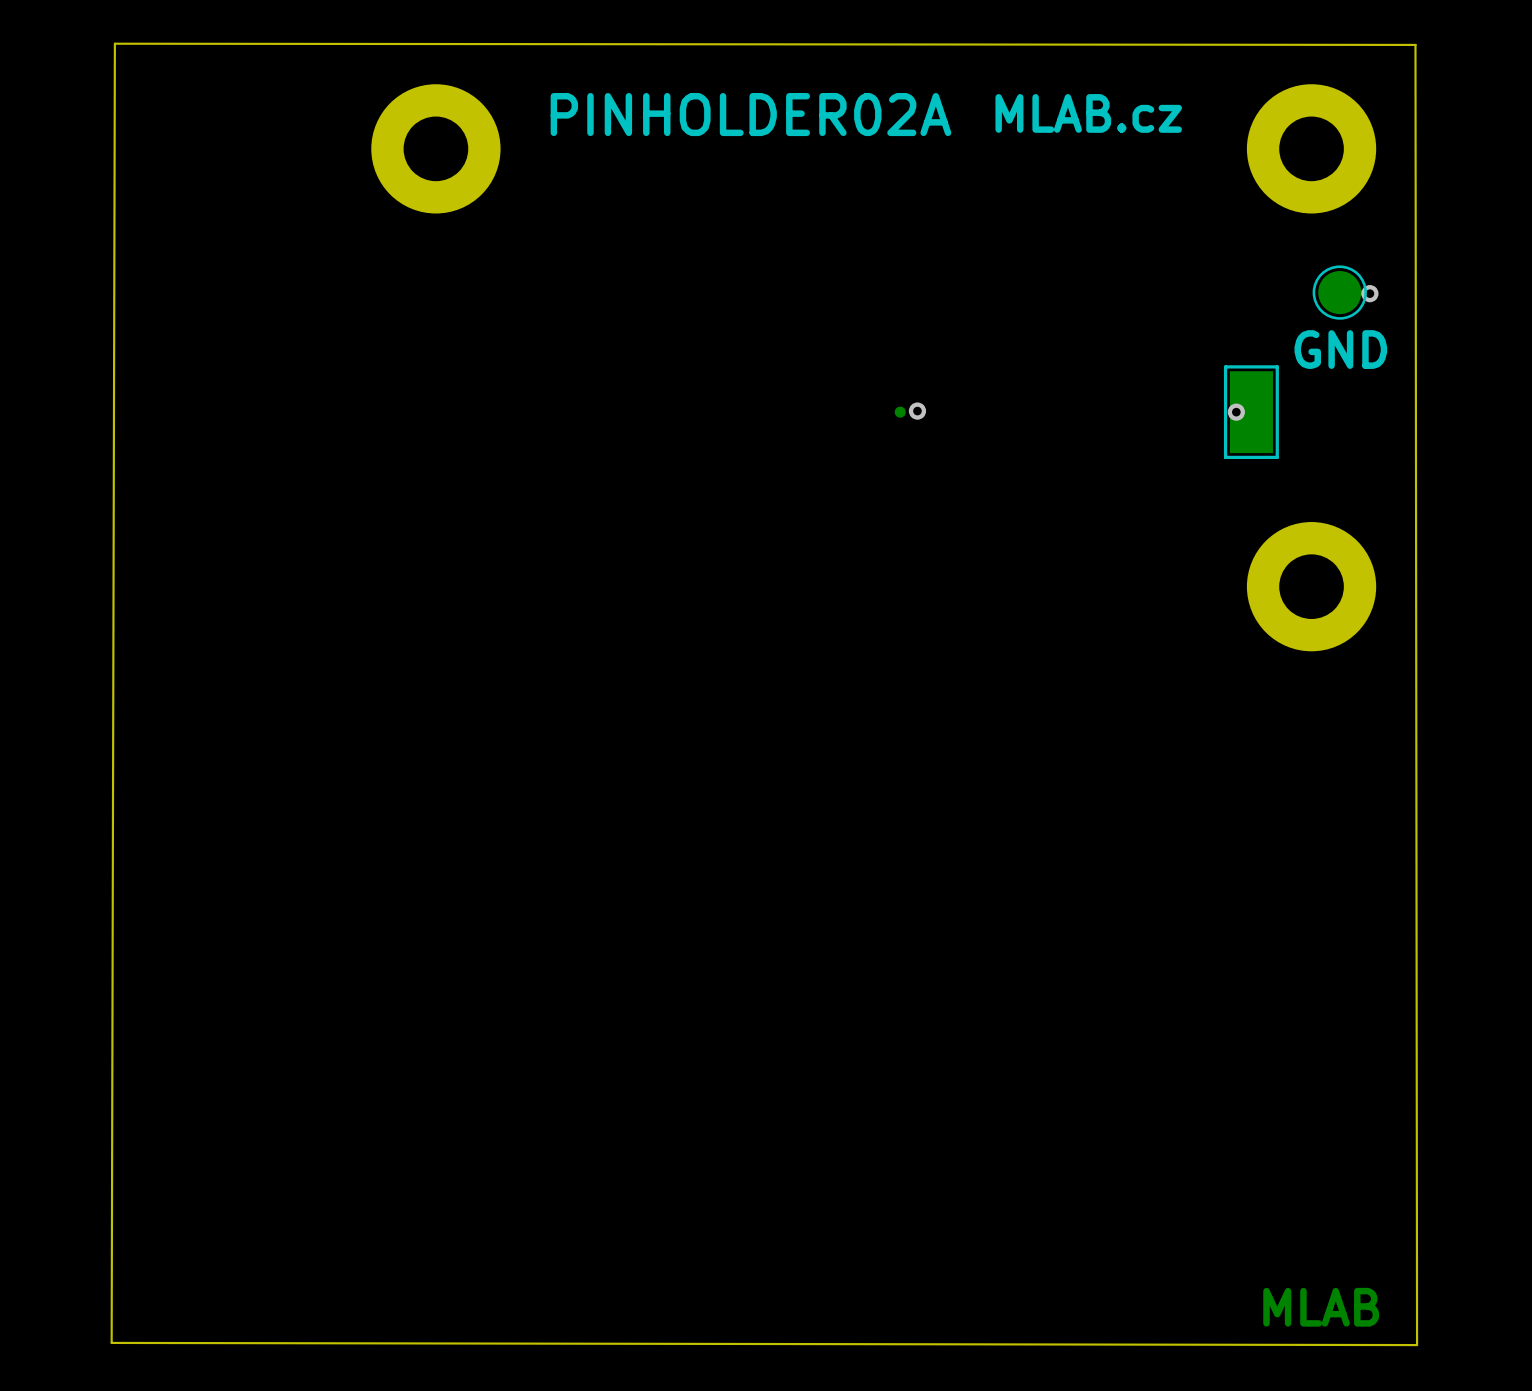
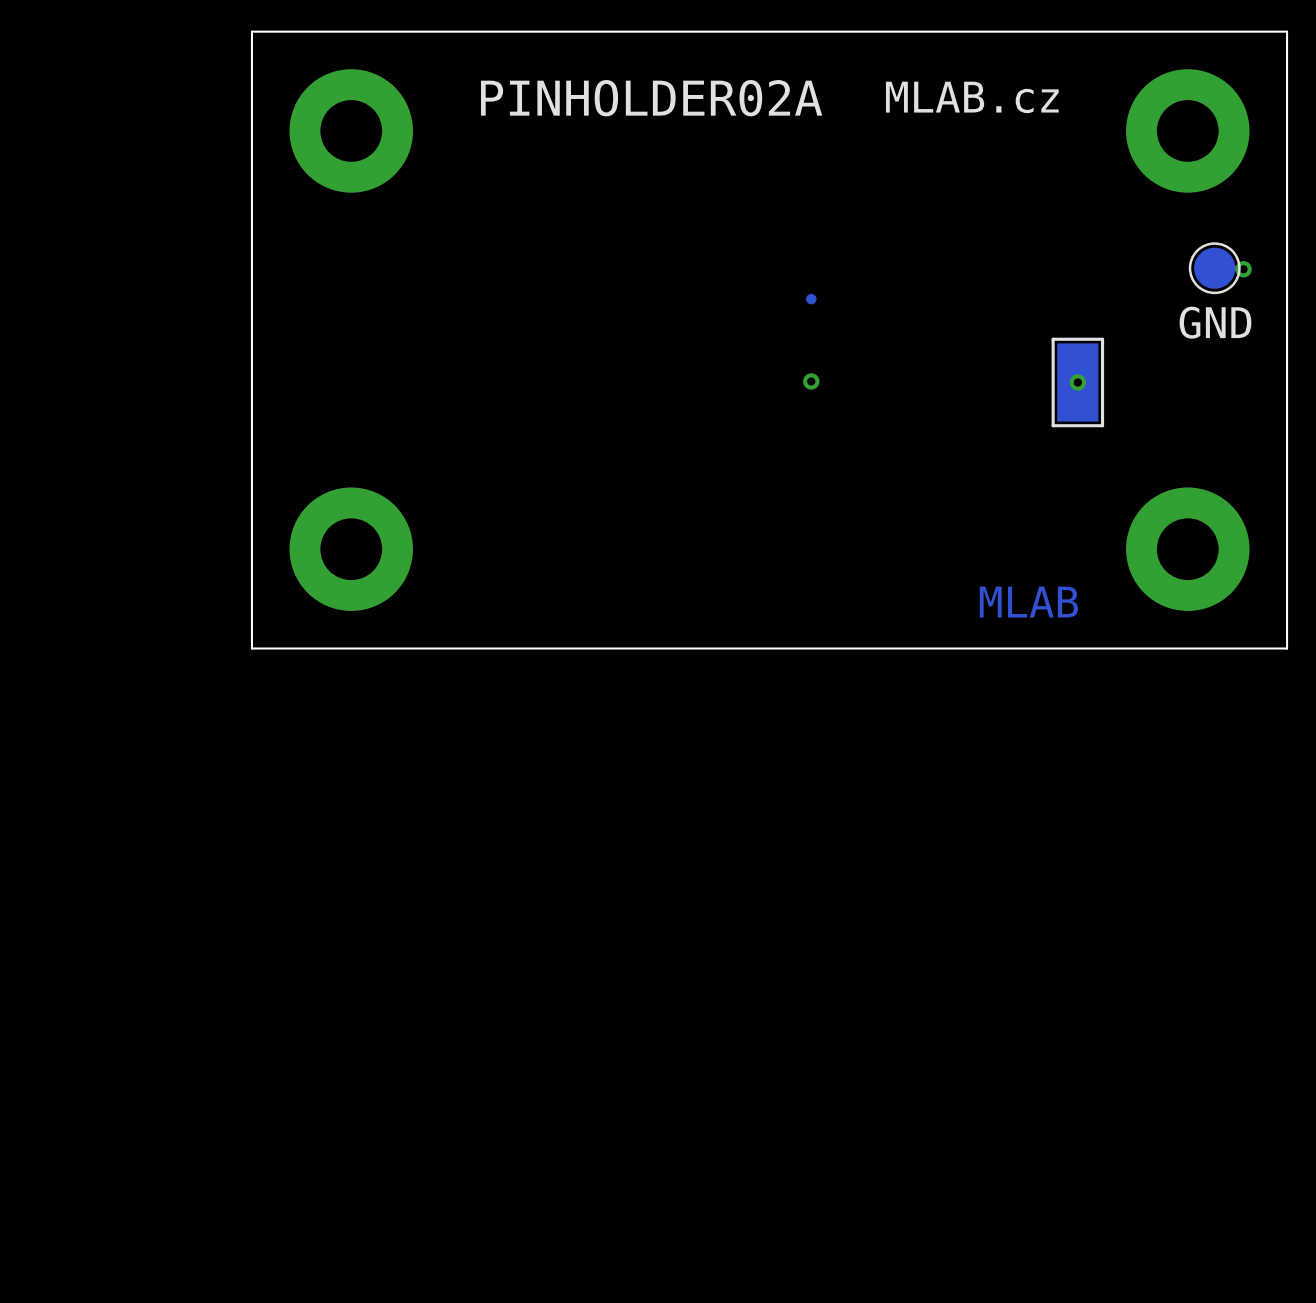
board edge: (114, 43) (1415, 44) (1417, 1345) (111, 1342) (114, 43) -> none
board edge: none -> (1287, 31) (251, 31) (251, 648) (1287, 648) (1287, 31)
part position: (900, 412) -> (811, 299)
via position: (1236, 412) -> (1077, 382)
part position: (1251, 412) -> (1077, 382)
part: none -> (351, 549)
text: none -> MLAB (1028, 602)
text: MLAB (1321, 1307) -> none

